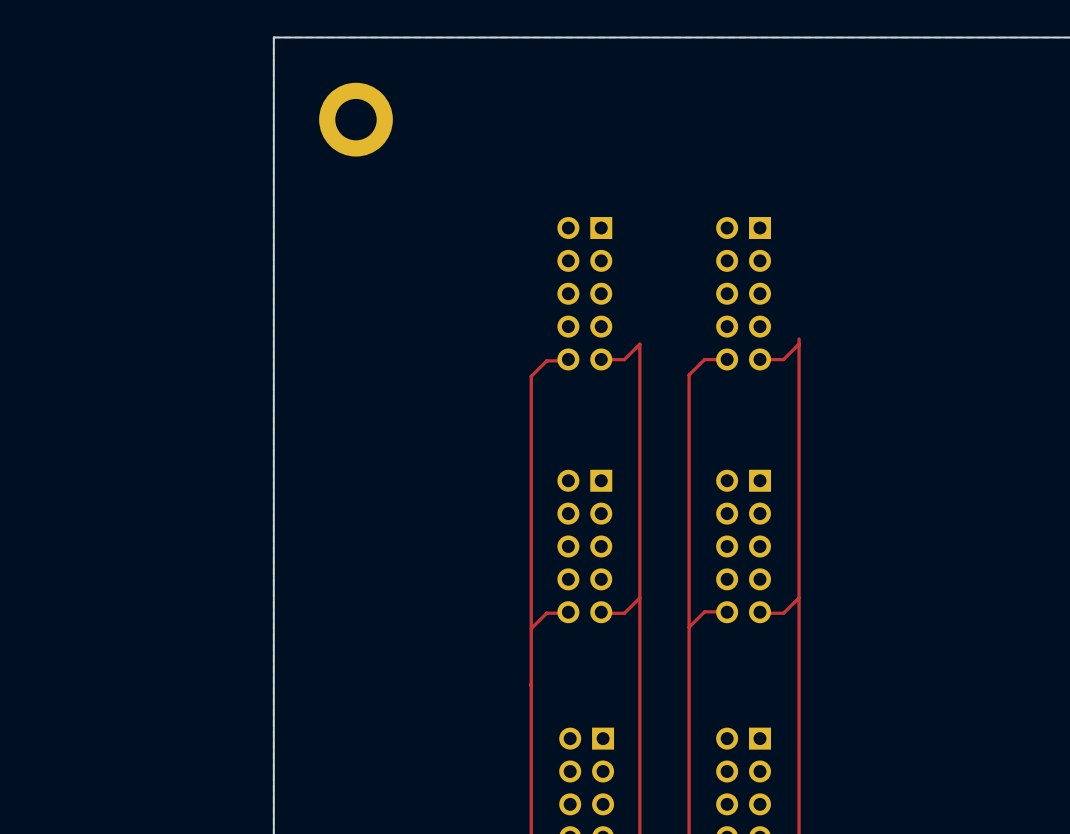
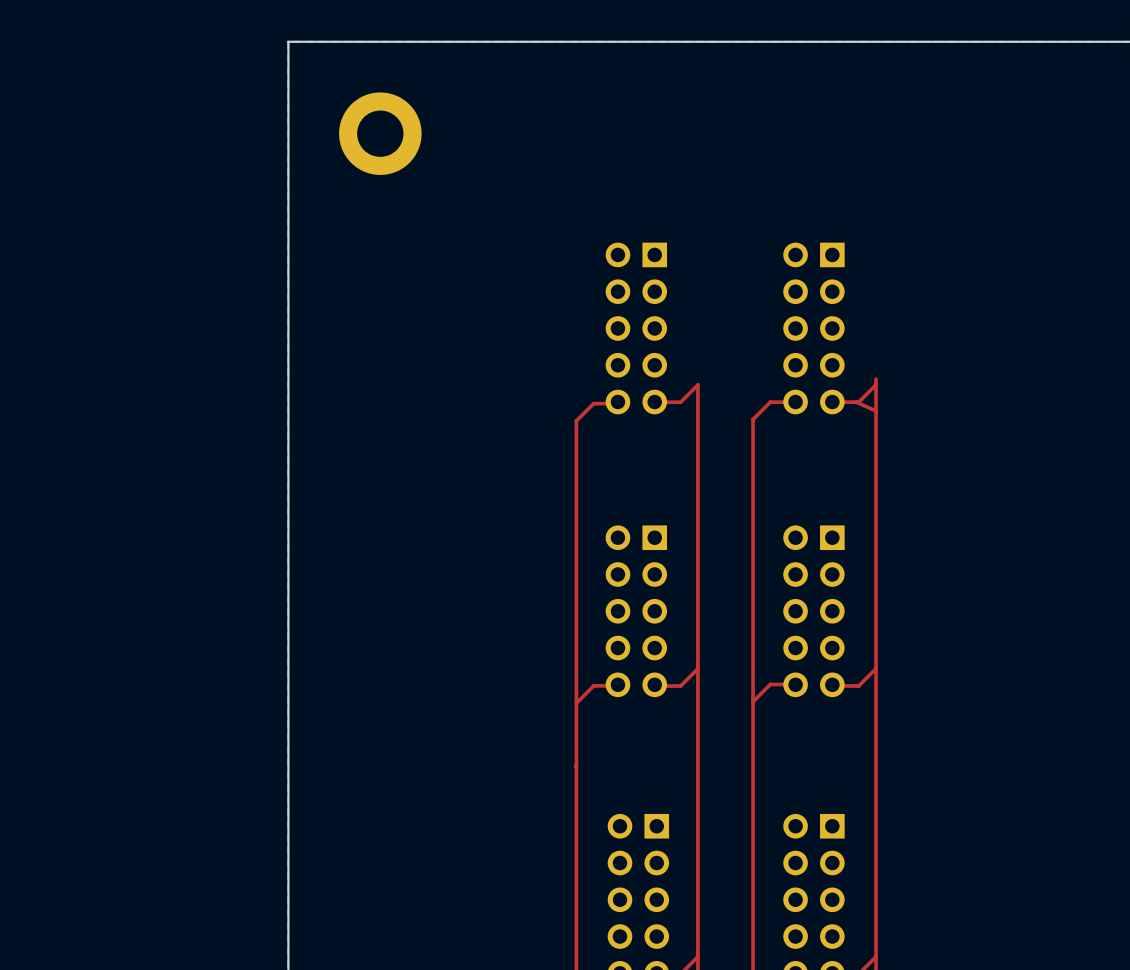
top track: none -> (856, 402) (876, 410)

